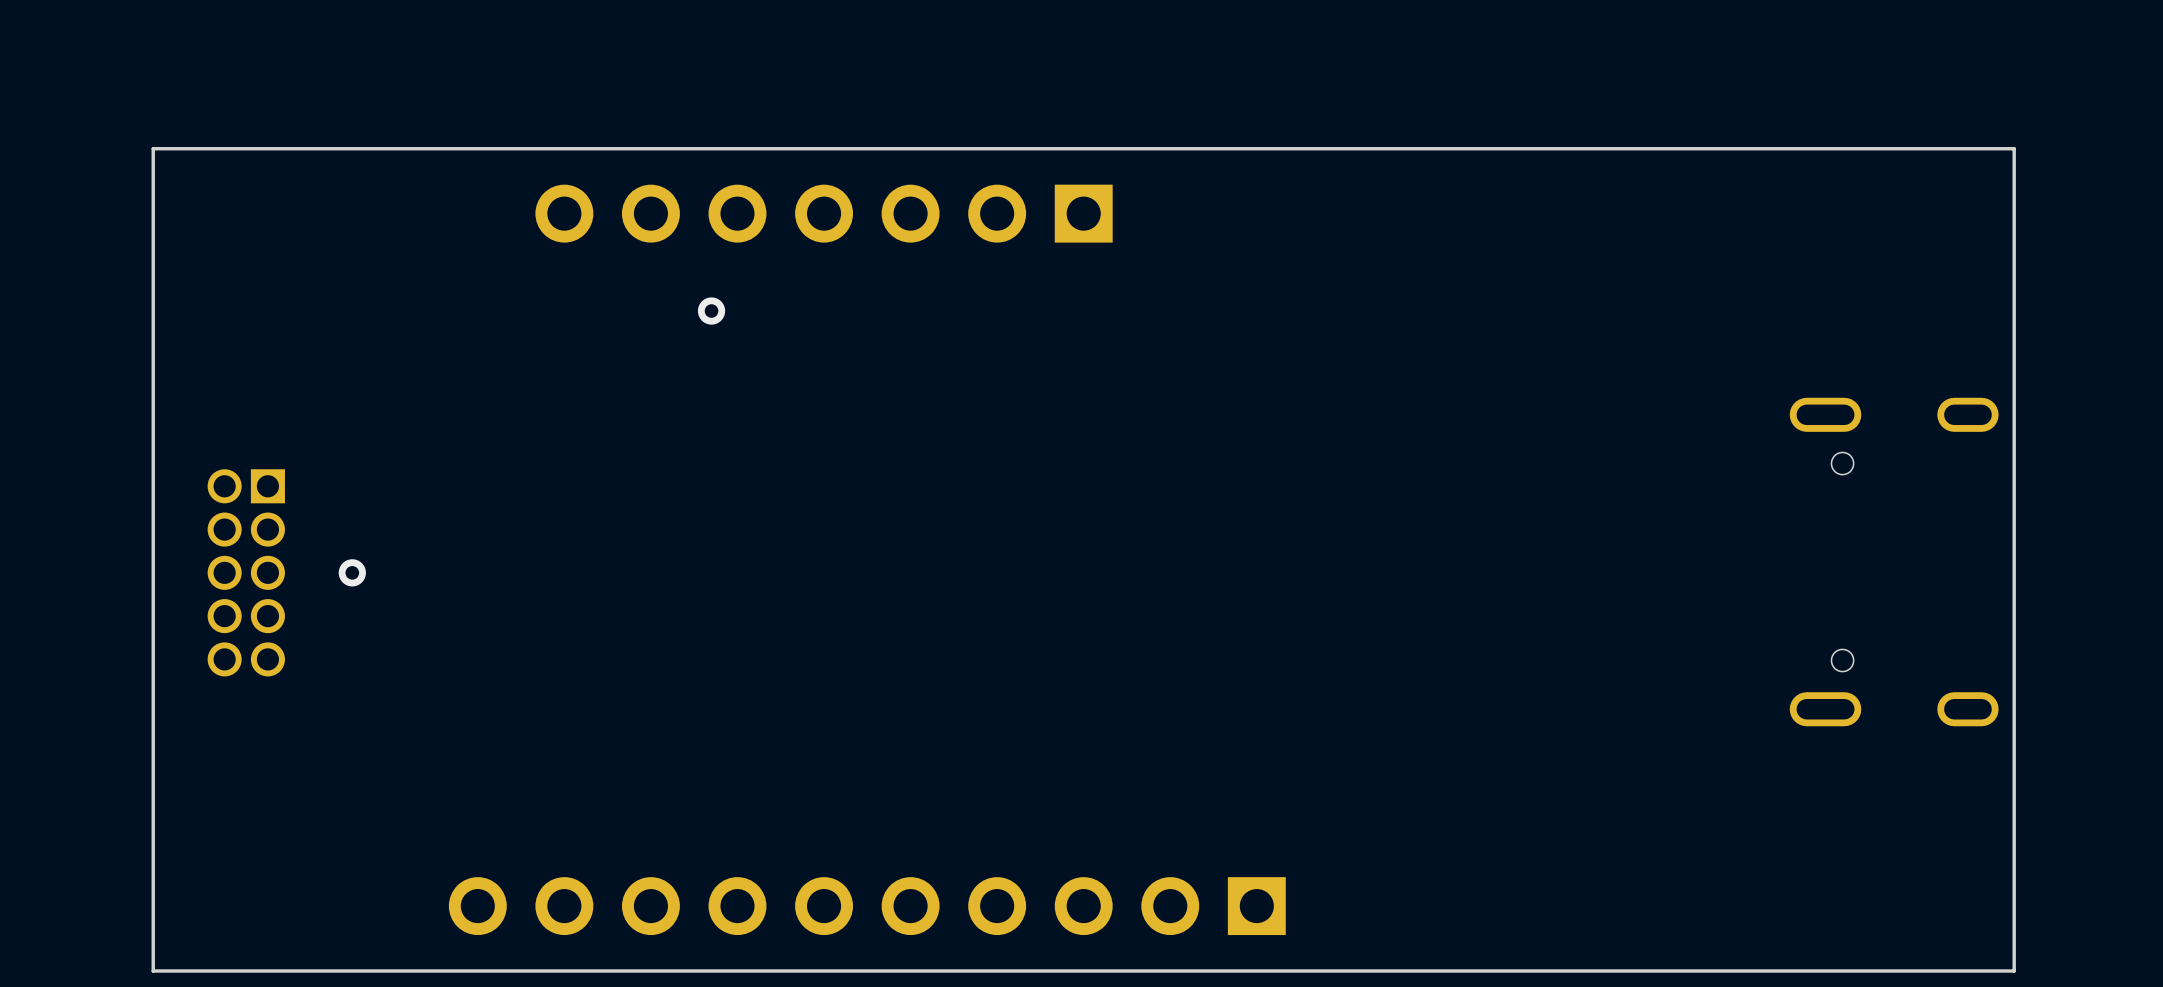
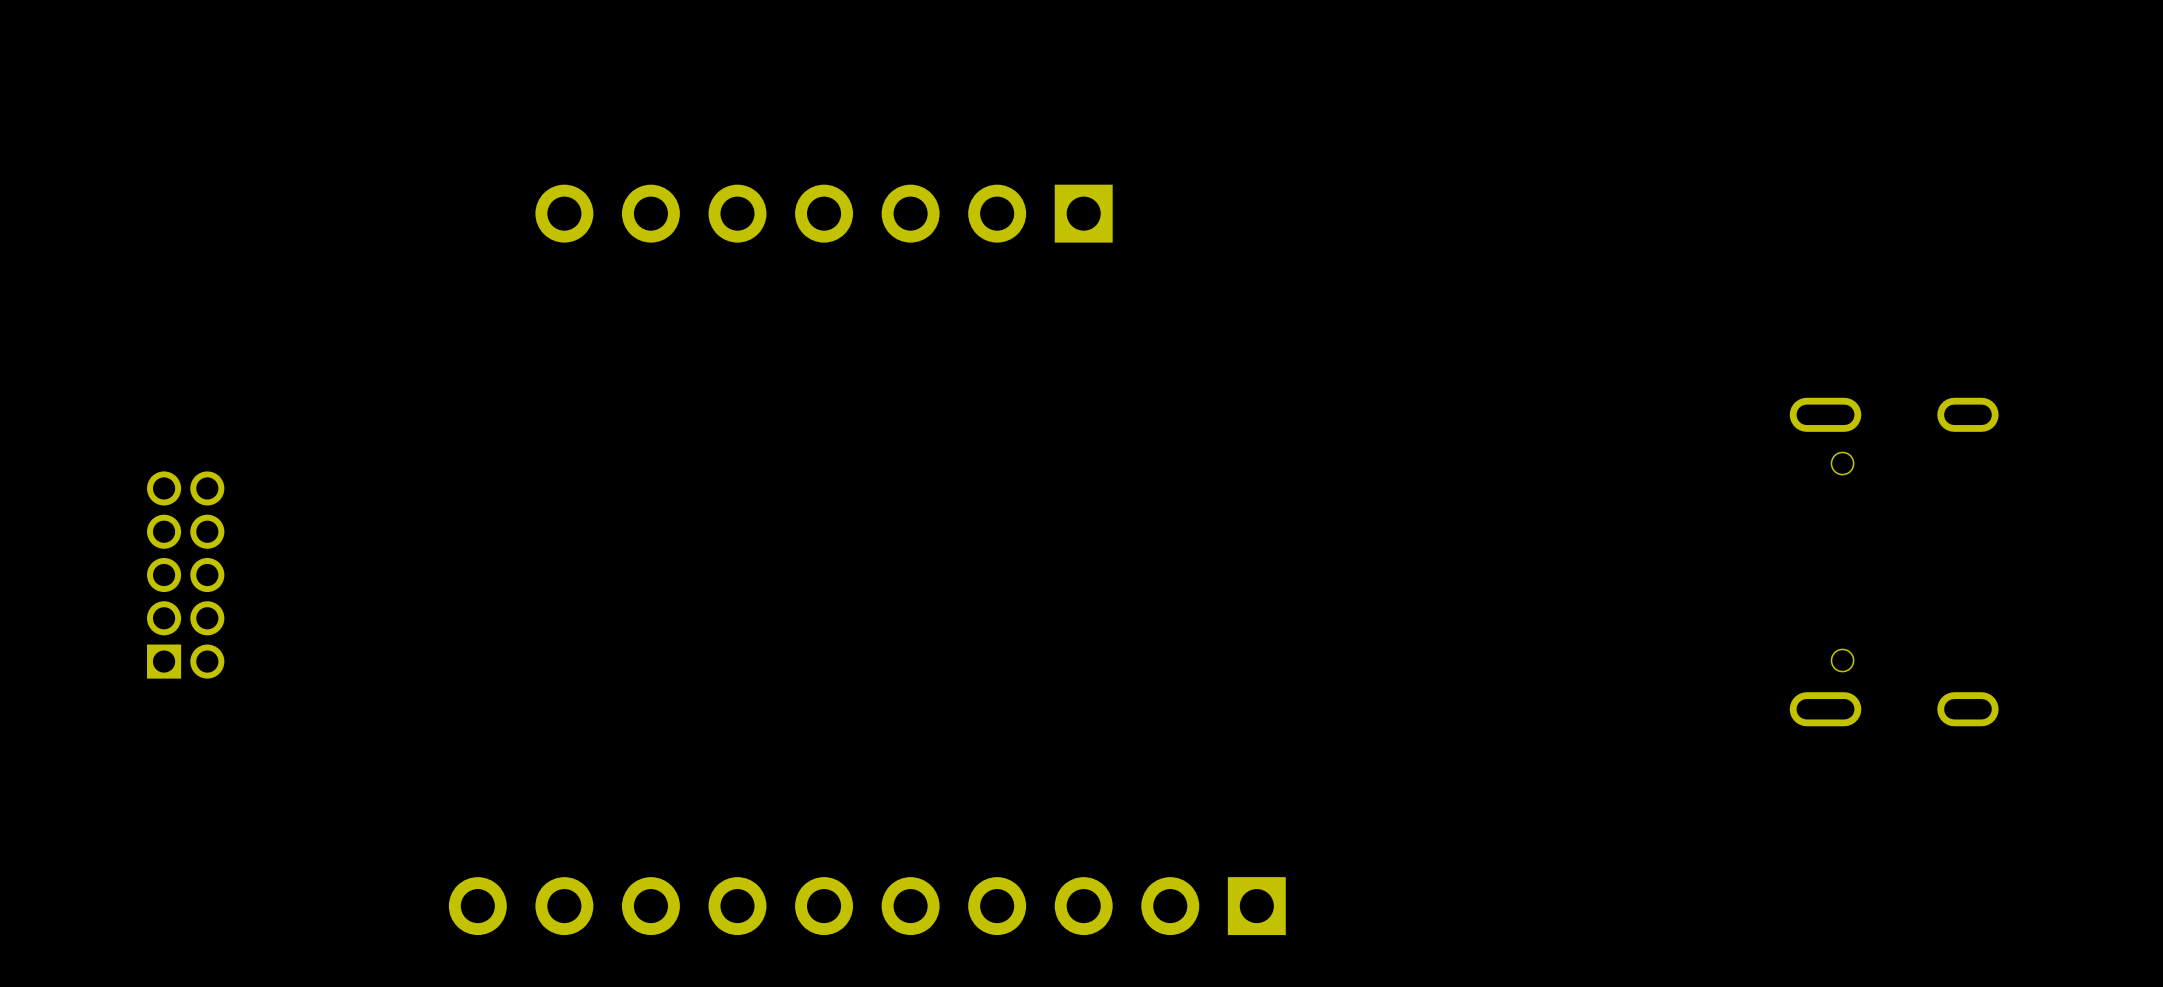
board edge: (2014, 148) (153, 148) (153, 971) (2014, 971) (2014, 148) -> none
via: (711, 311) -> none
part rotation: 0° (246, 572) -> 180° (185, 575)
via: (352, 572) -> none

